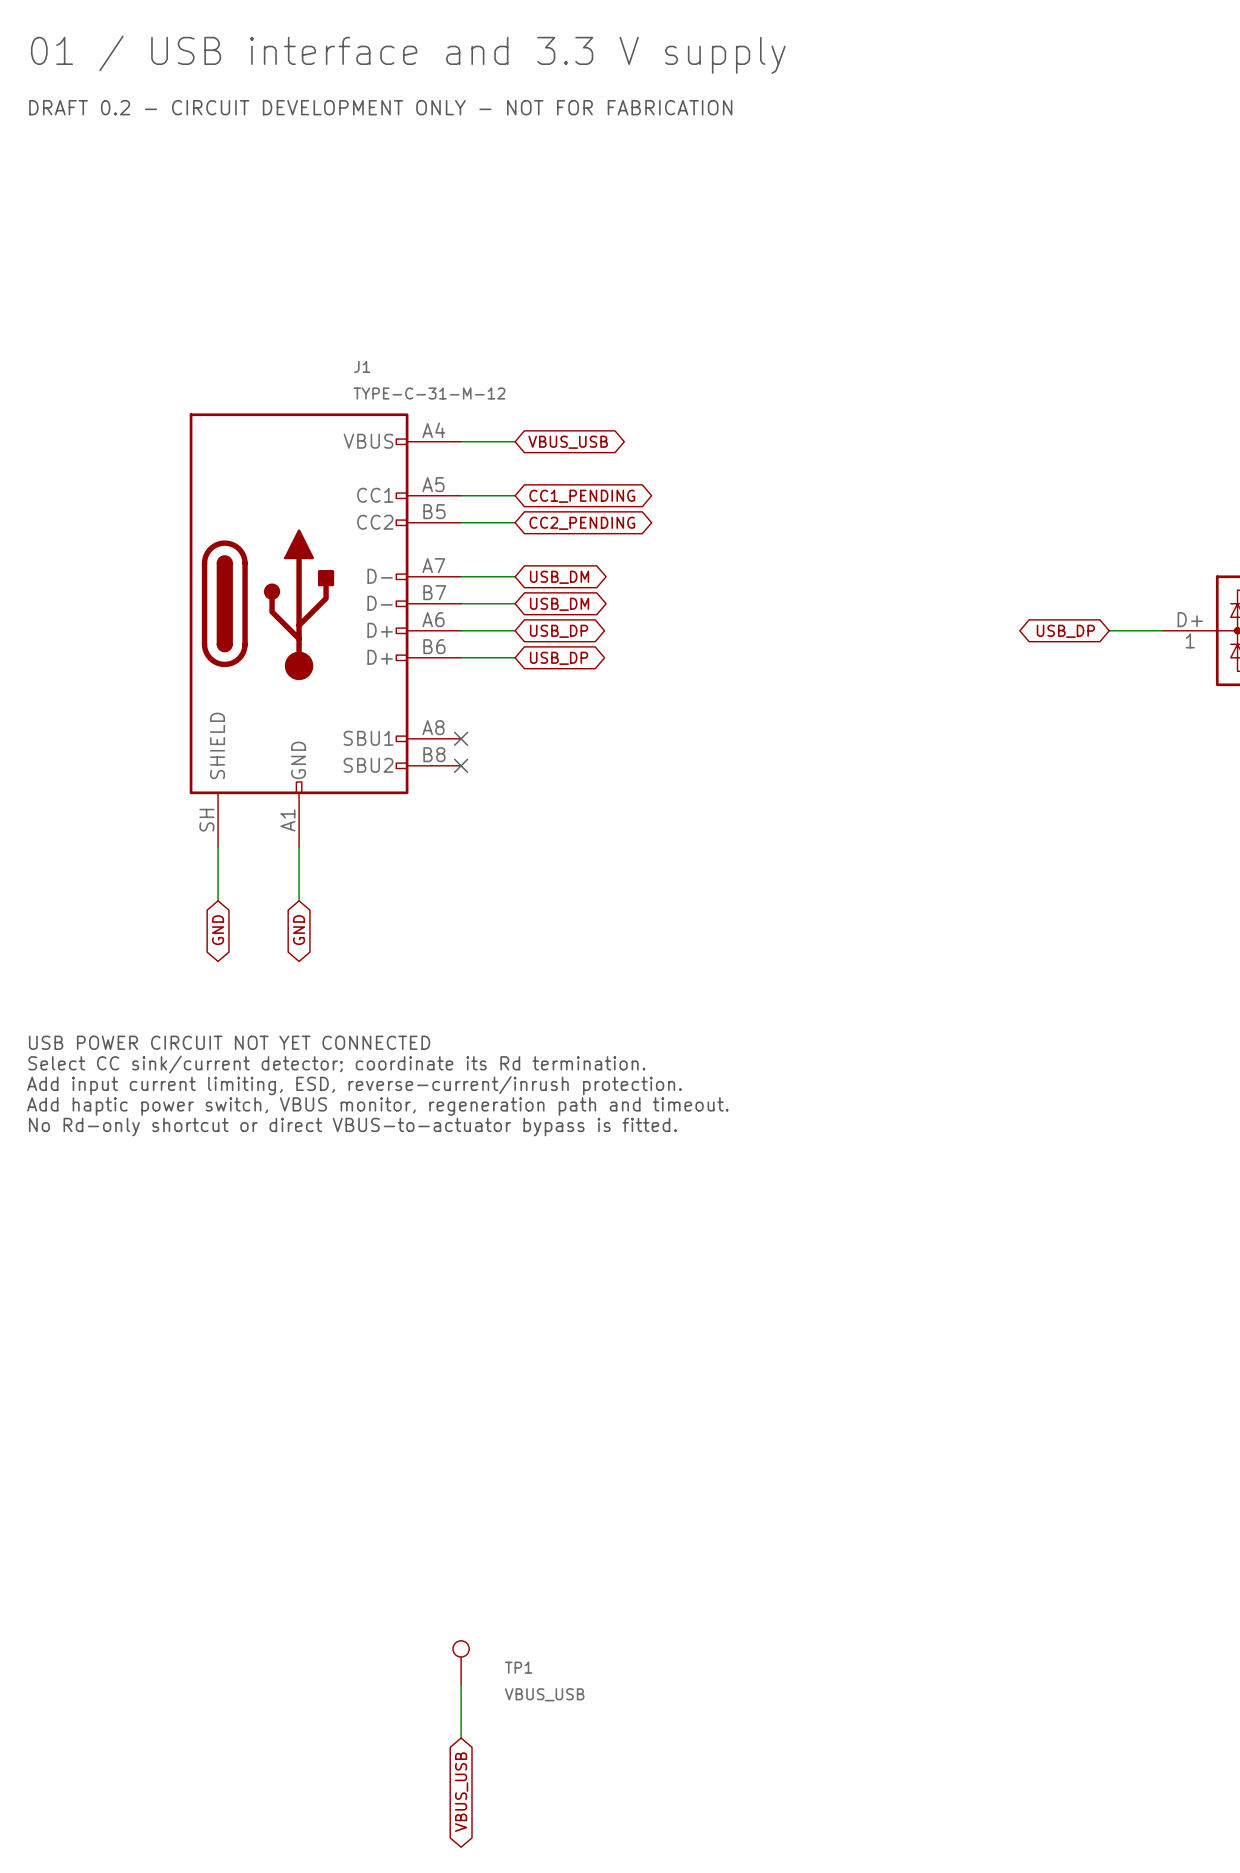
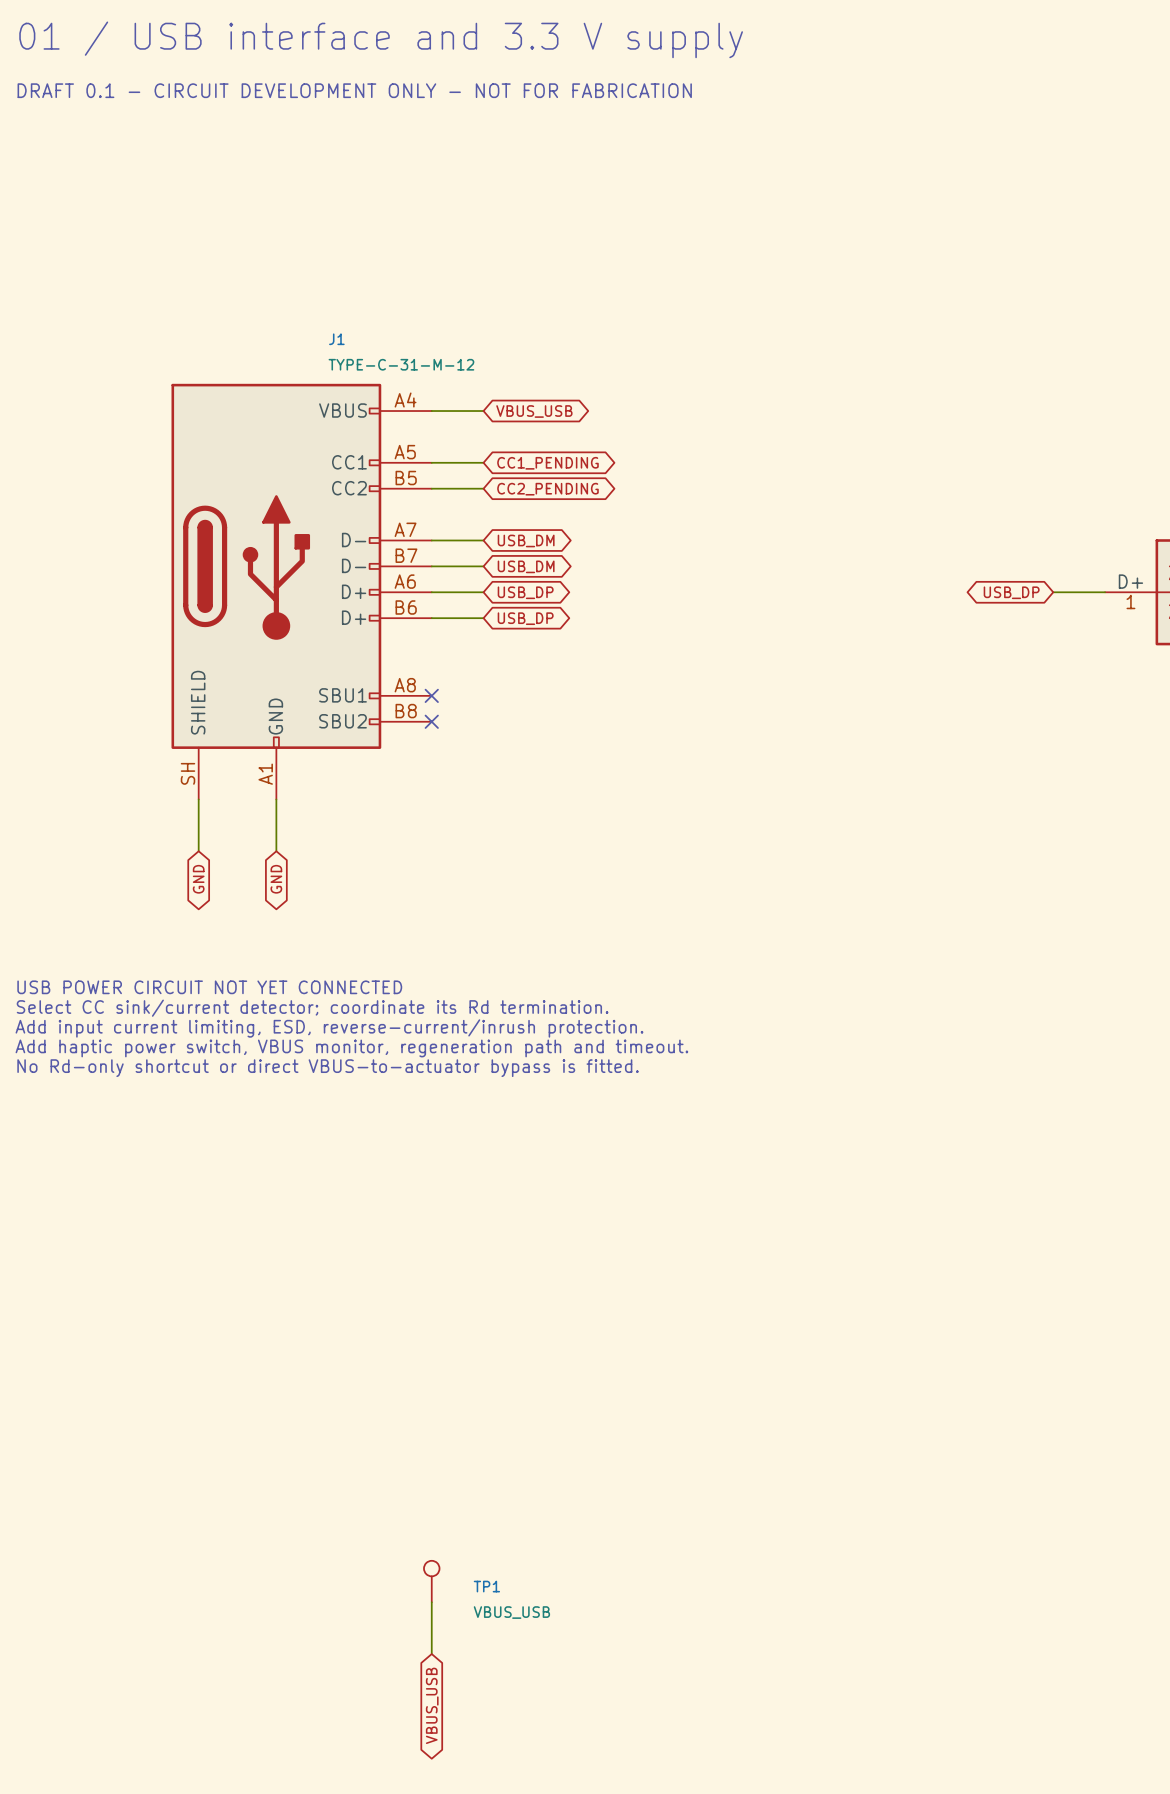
text: DRAFT 0.2 - CIRCUIT DEVELOPMENT ONLY - NOT FOR FABRICATION (380, 107) -> DRAFT 0.1 - CIRCUIT DEVELOPMENT ONLY - NOT FOR FABRICATION (354, 90)

